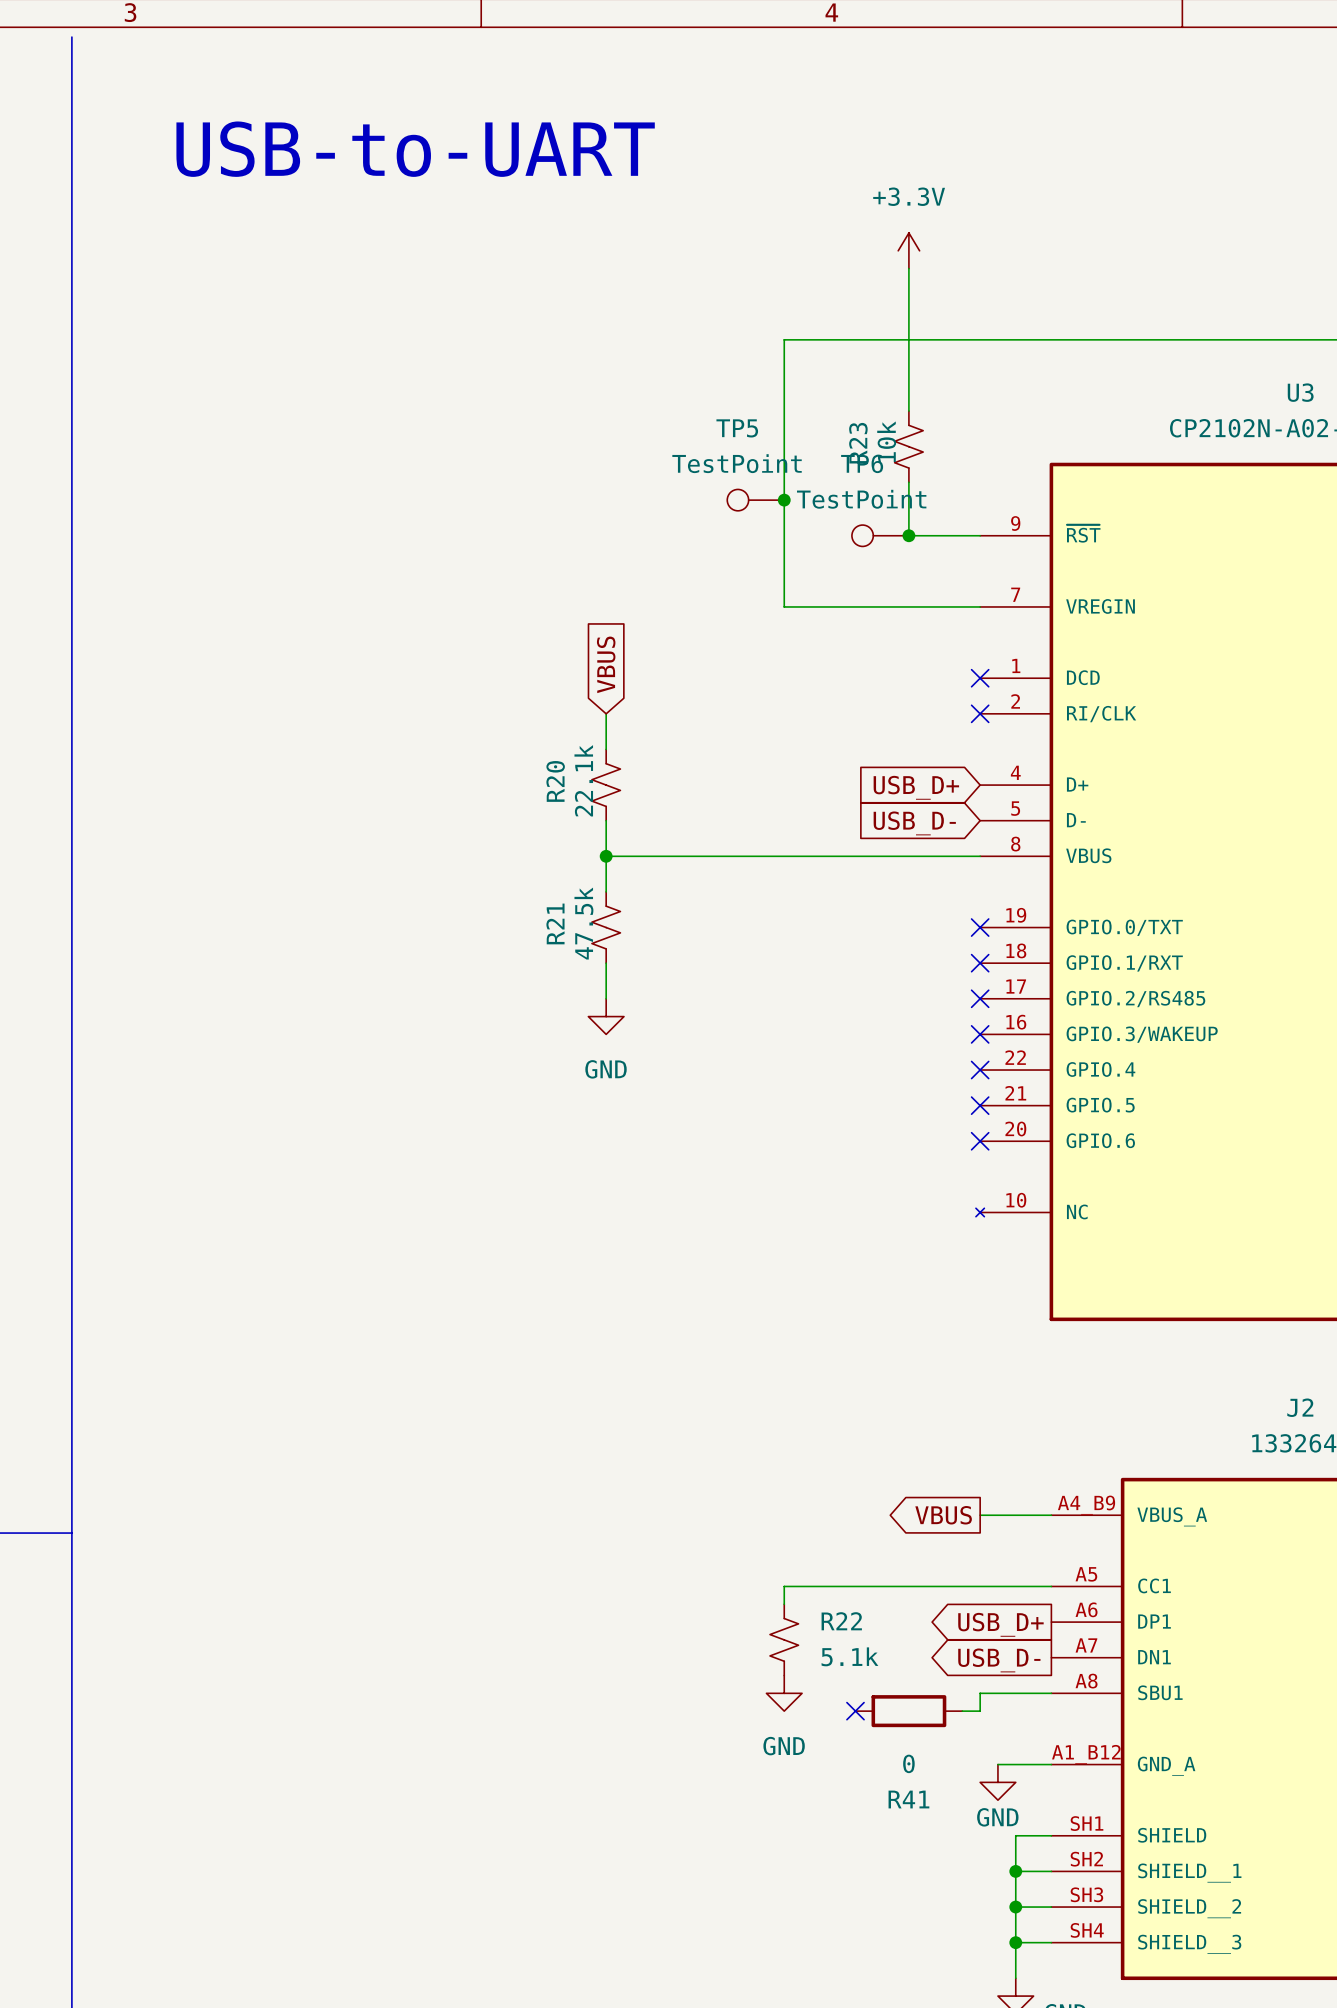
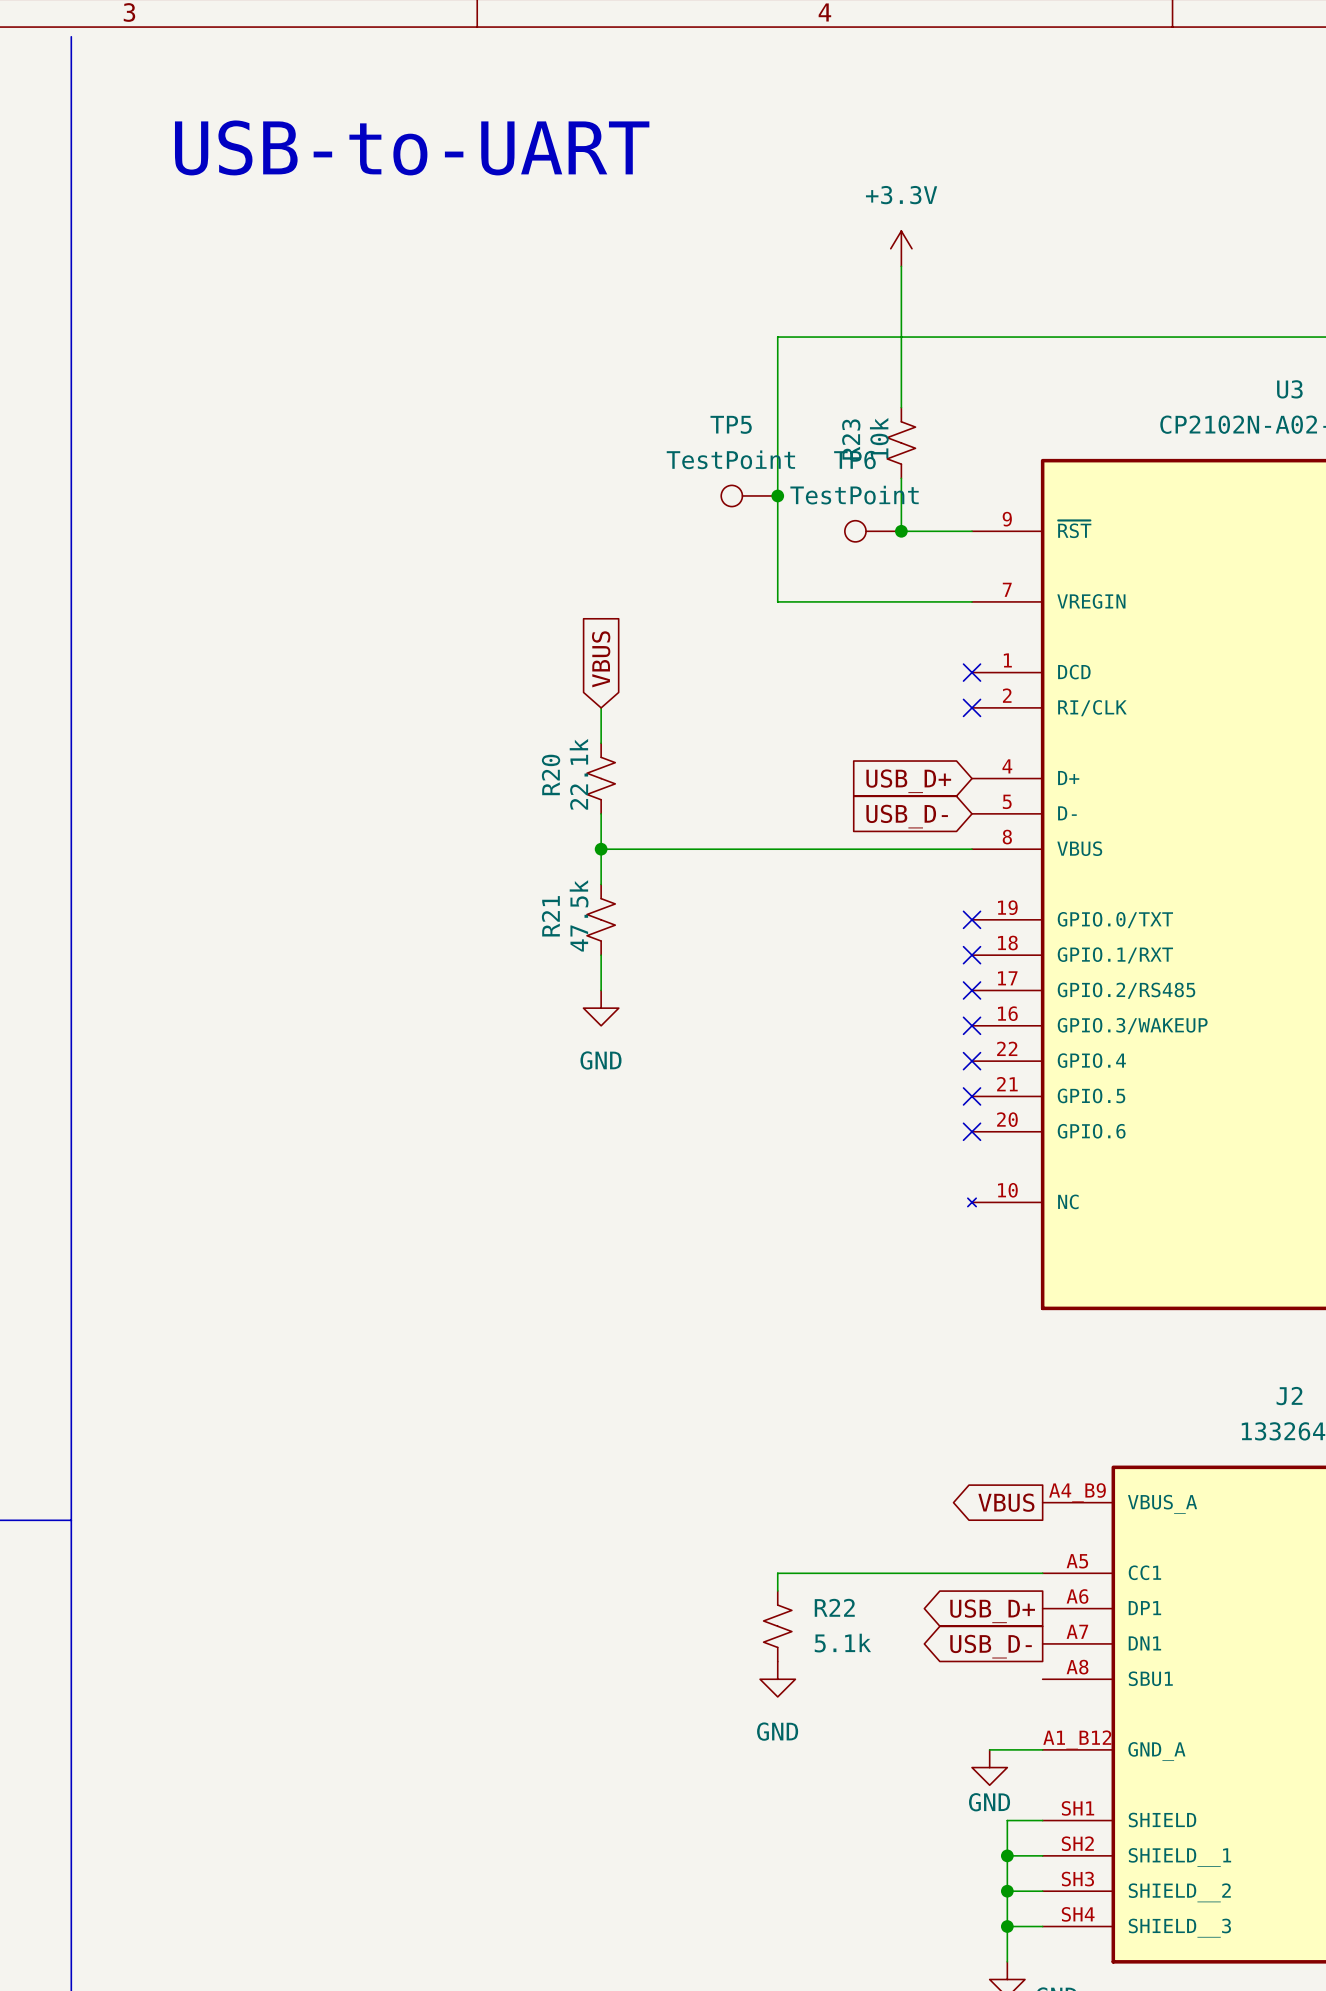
global label position: VBUS (943, 1515) -> VBUS (1006, 1502)
wire: (980, 1515) (1051, 1515) -> none
wire: (1051, 1693) (980, 1693) (980, 1711) (962, 1711) -> none
no-connect mark: (855, 1711) -> none
R41: 0 (908, 1711) -> none

